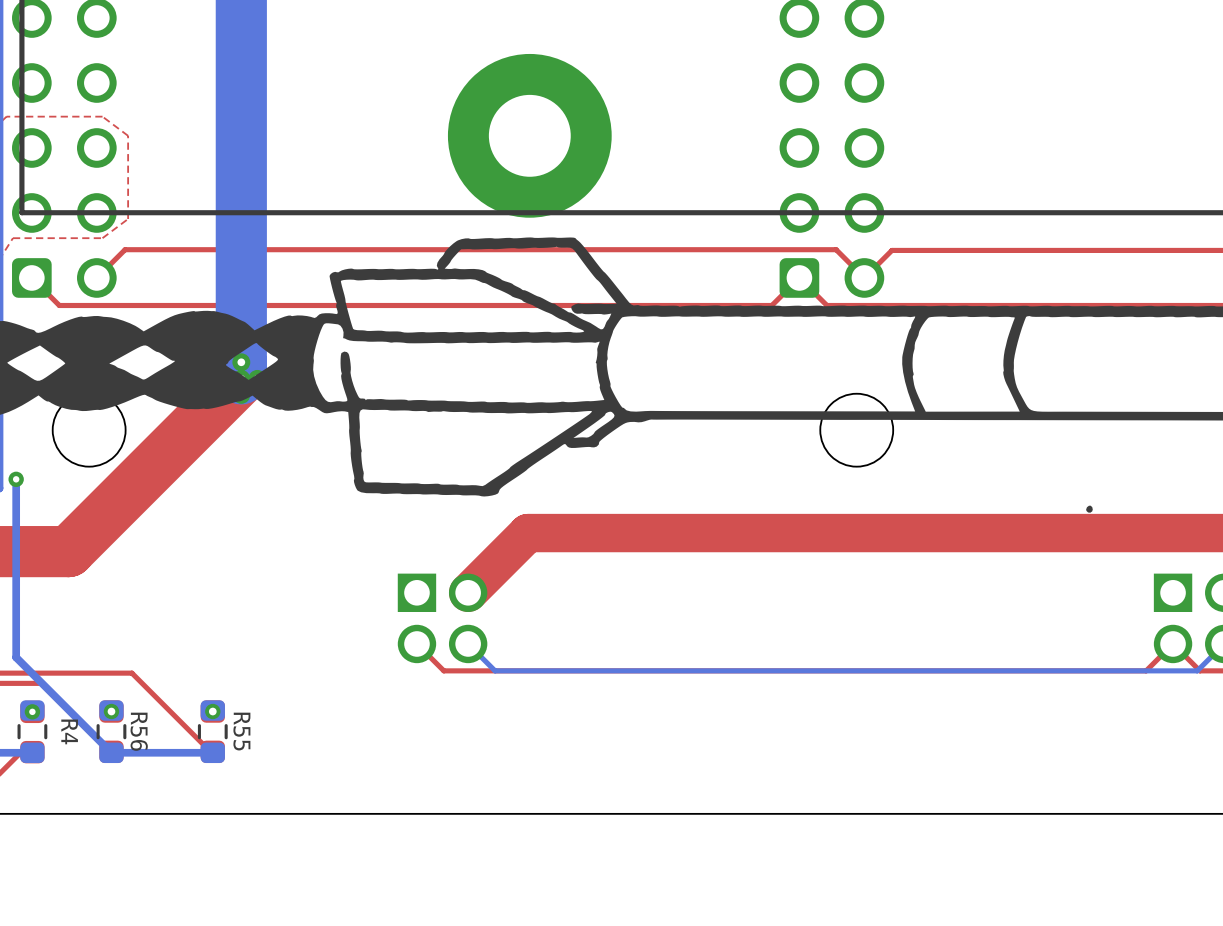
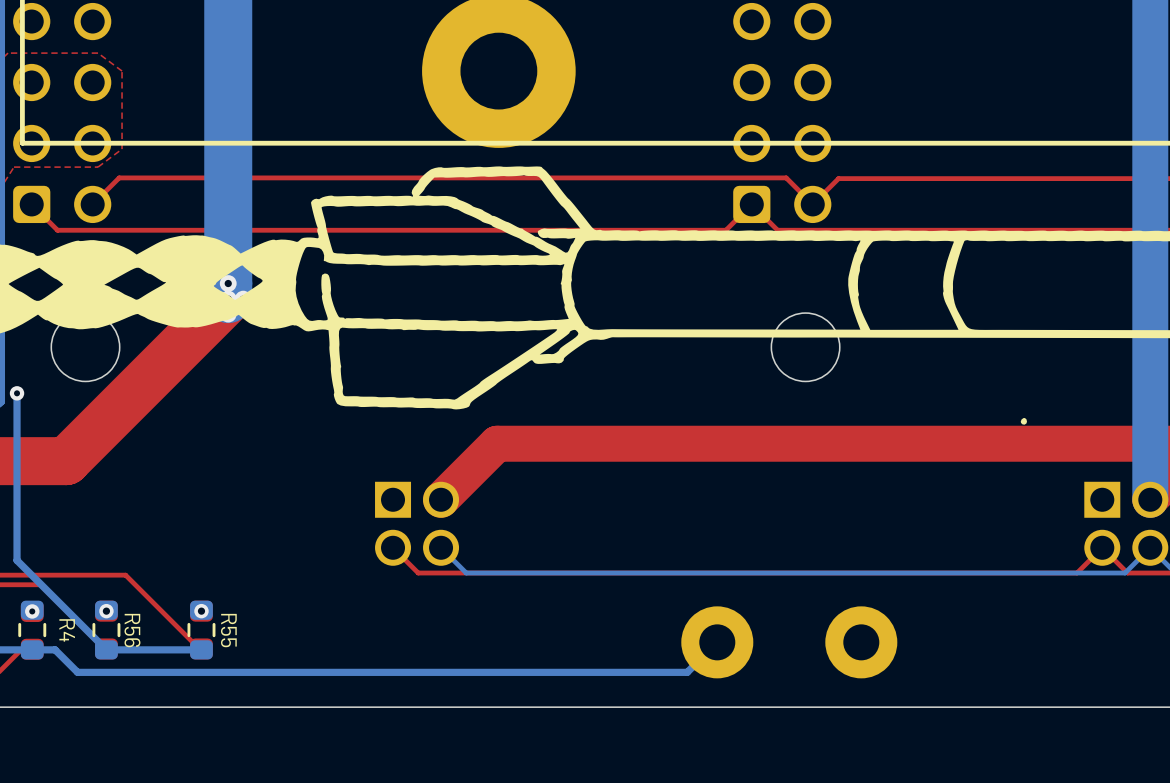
bottom track: none -> (717, 642) (687, 672) (77, 672) (55, 649) (32, 649)
part: none -> (717, 642)
part: none -> (861, 642)

